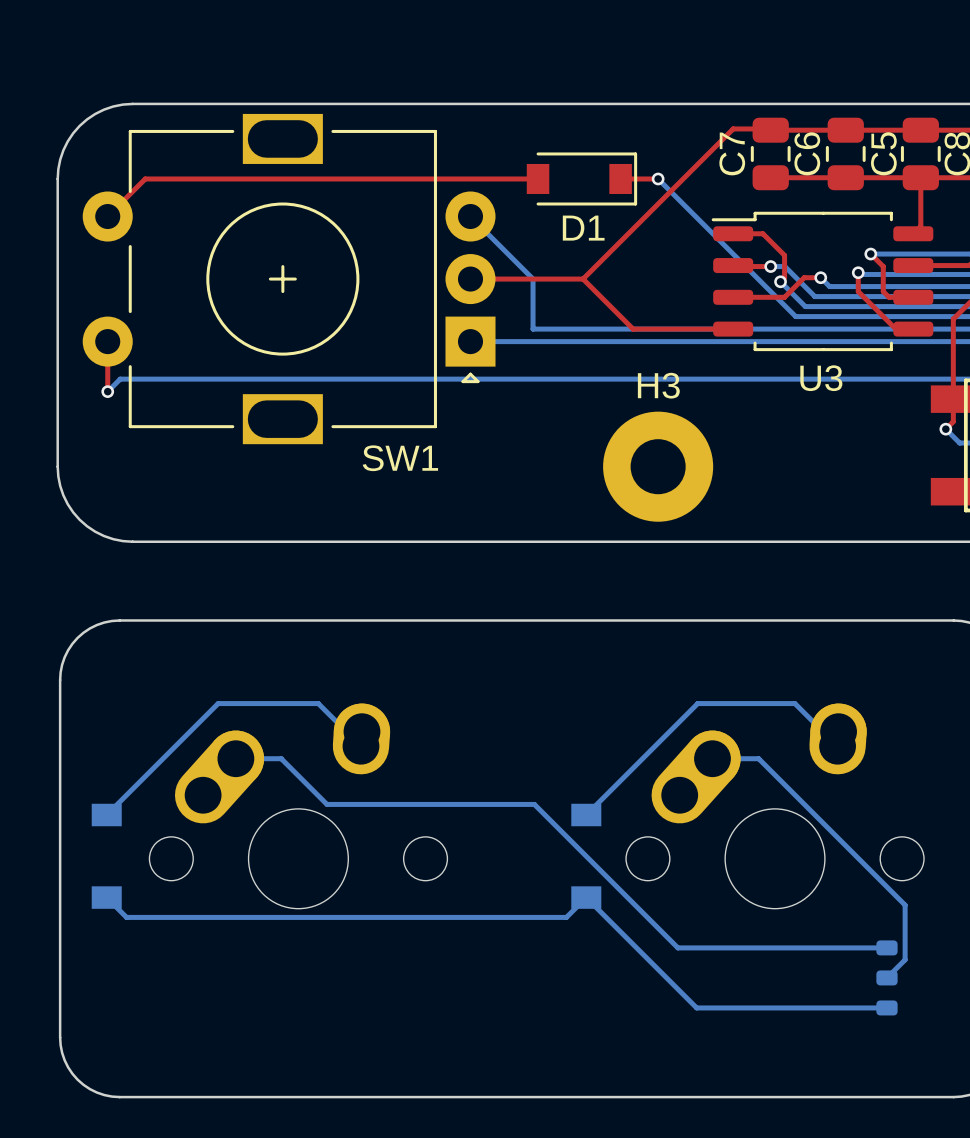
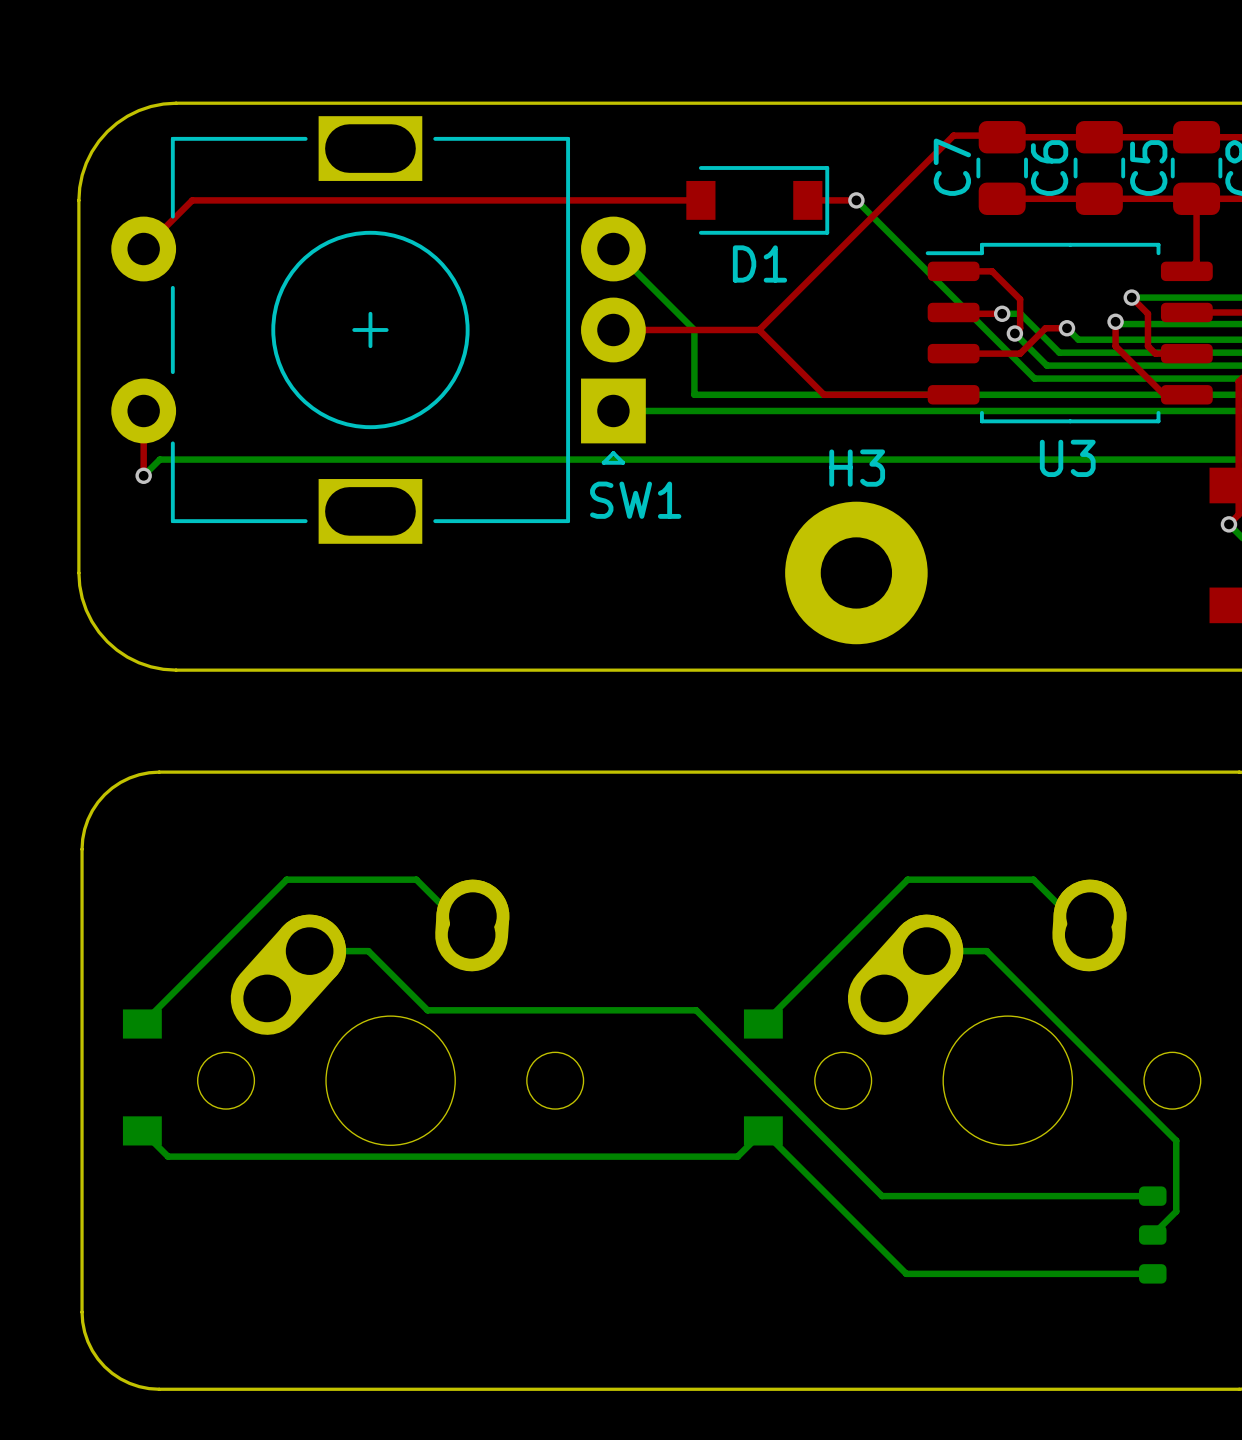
SW1 name position: SW1 (400, 458) -> SW1 (635, 500)

